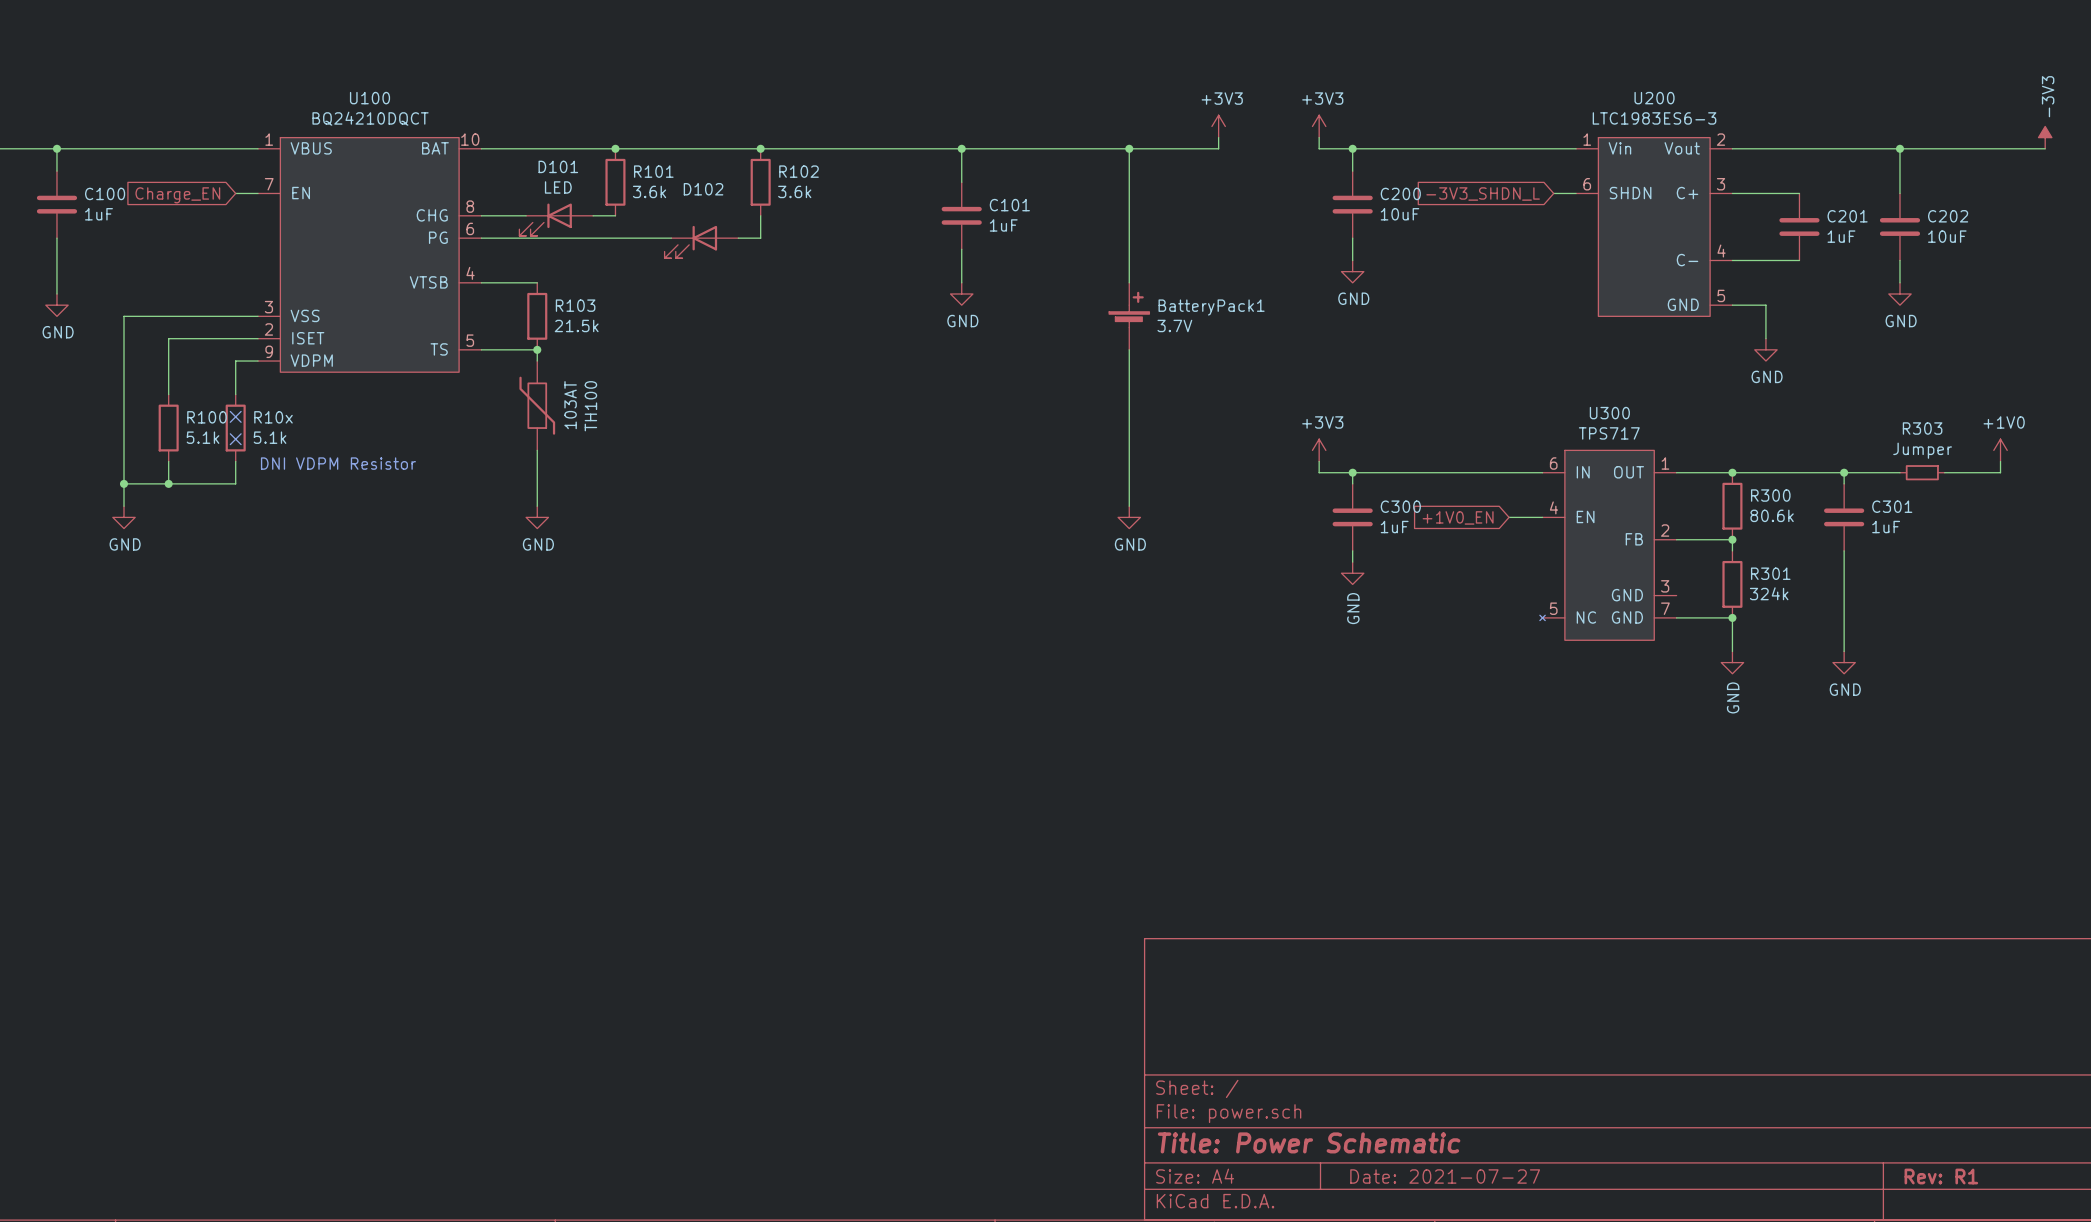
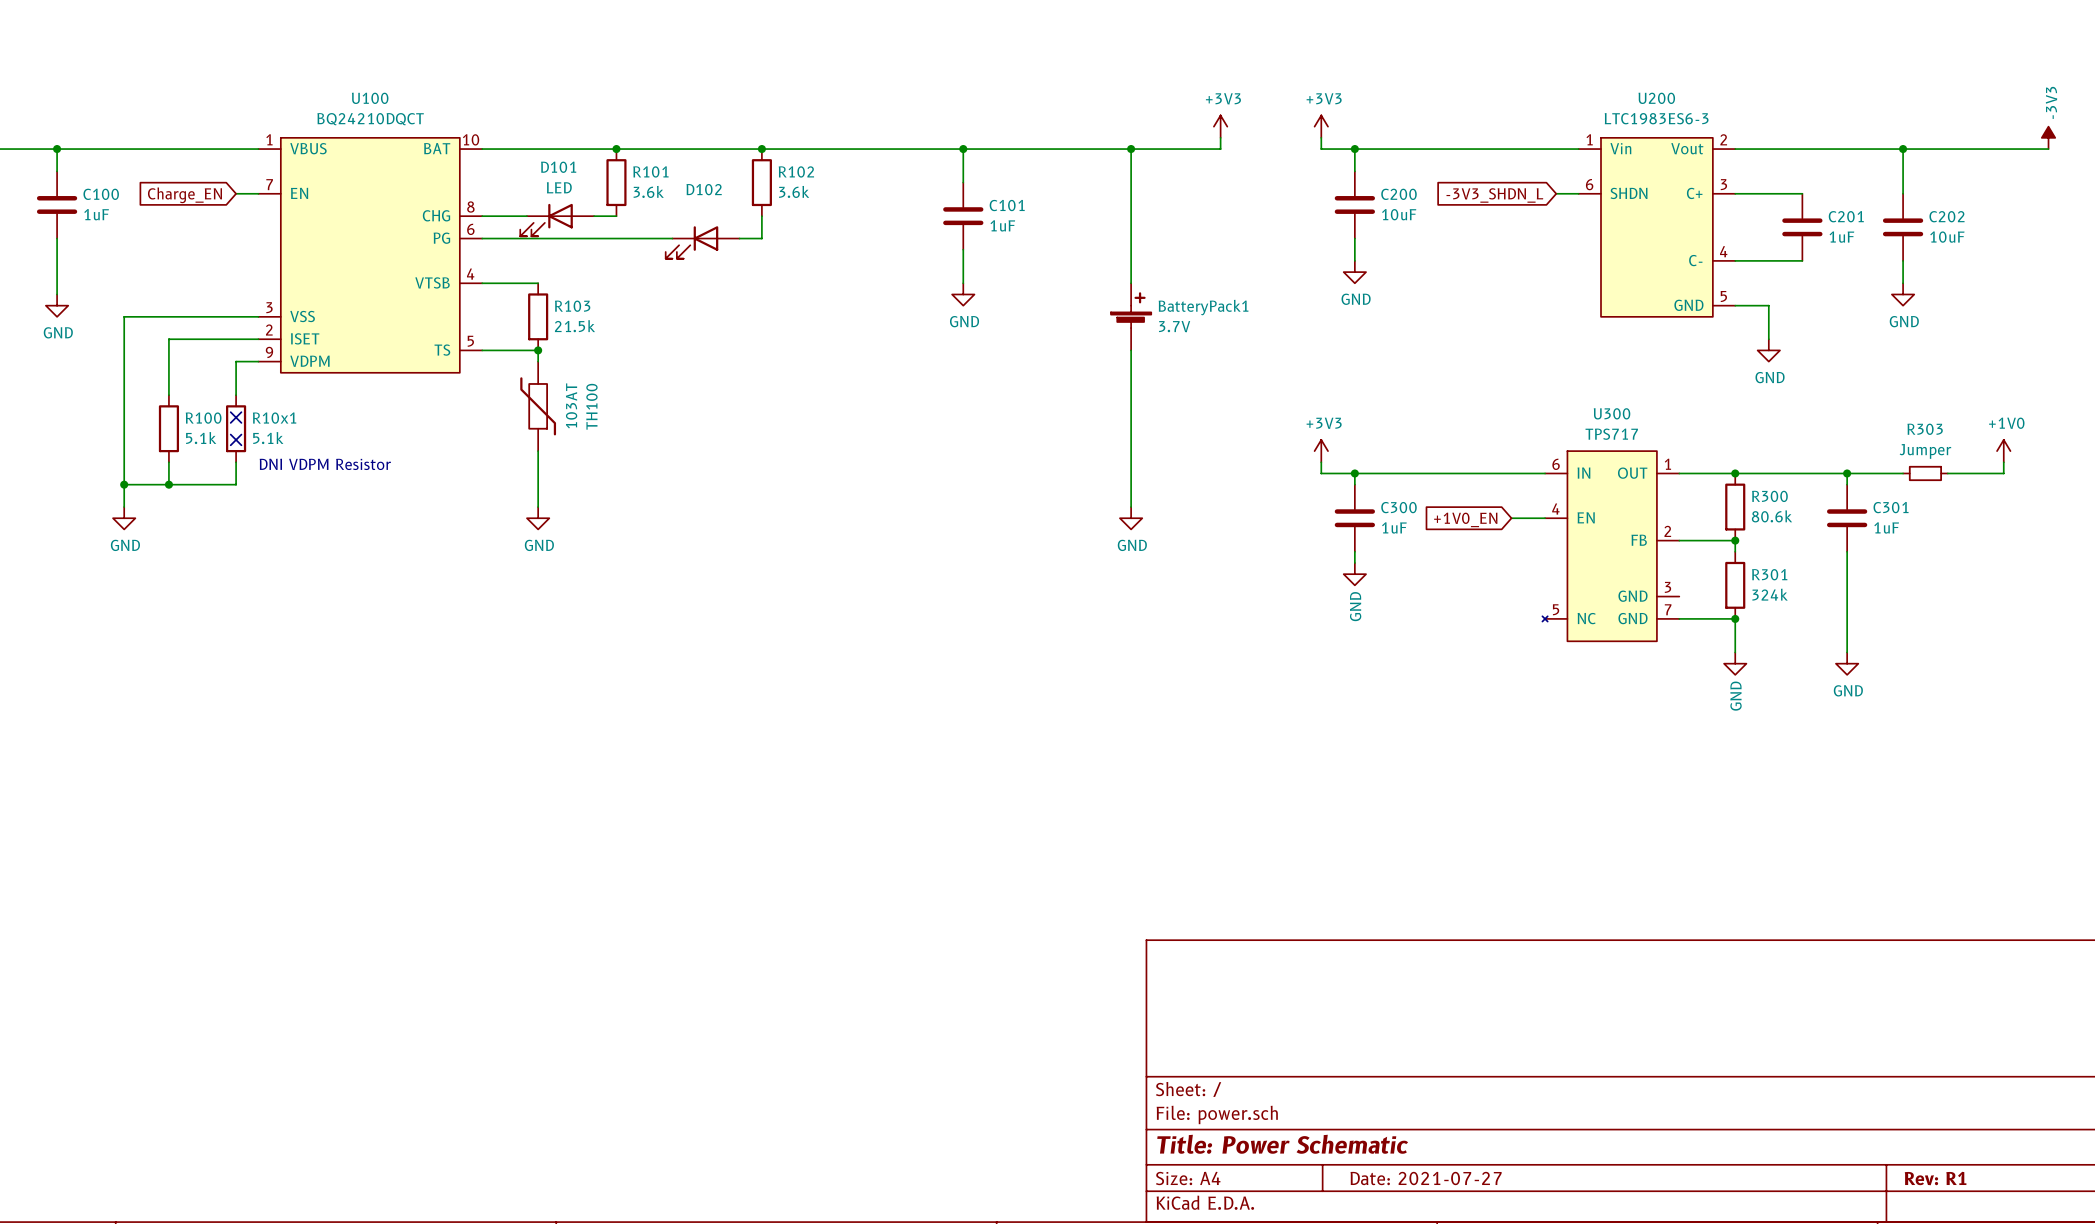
R10x name: R10x (273, 417) -> R10x1 (274, 418)

